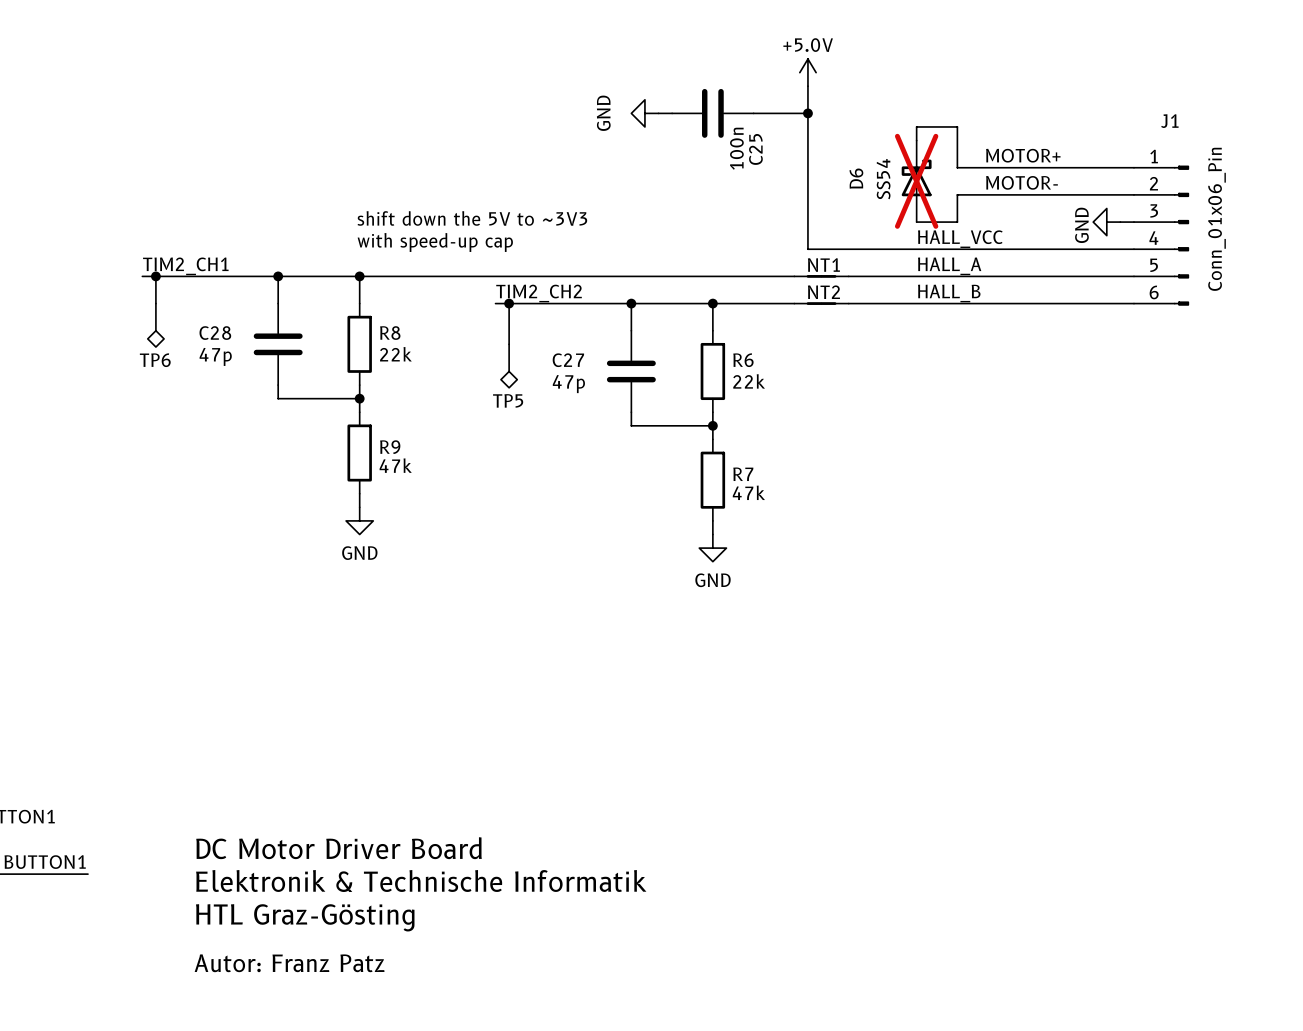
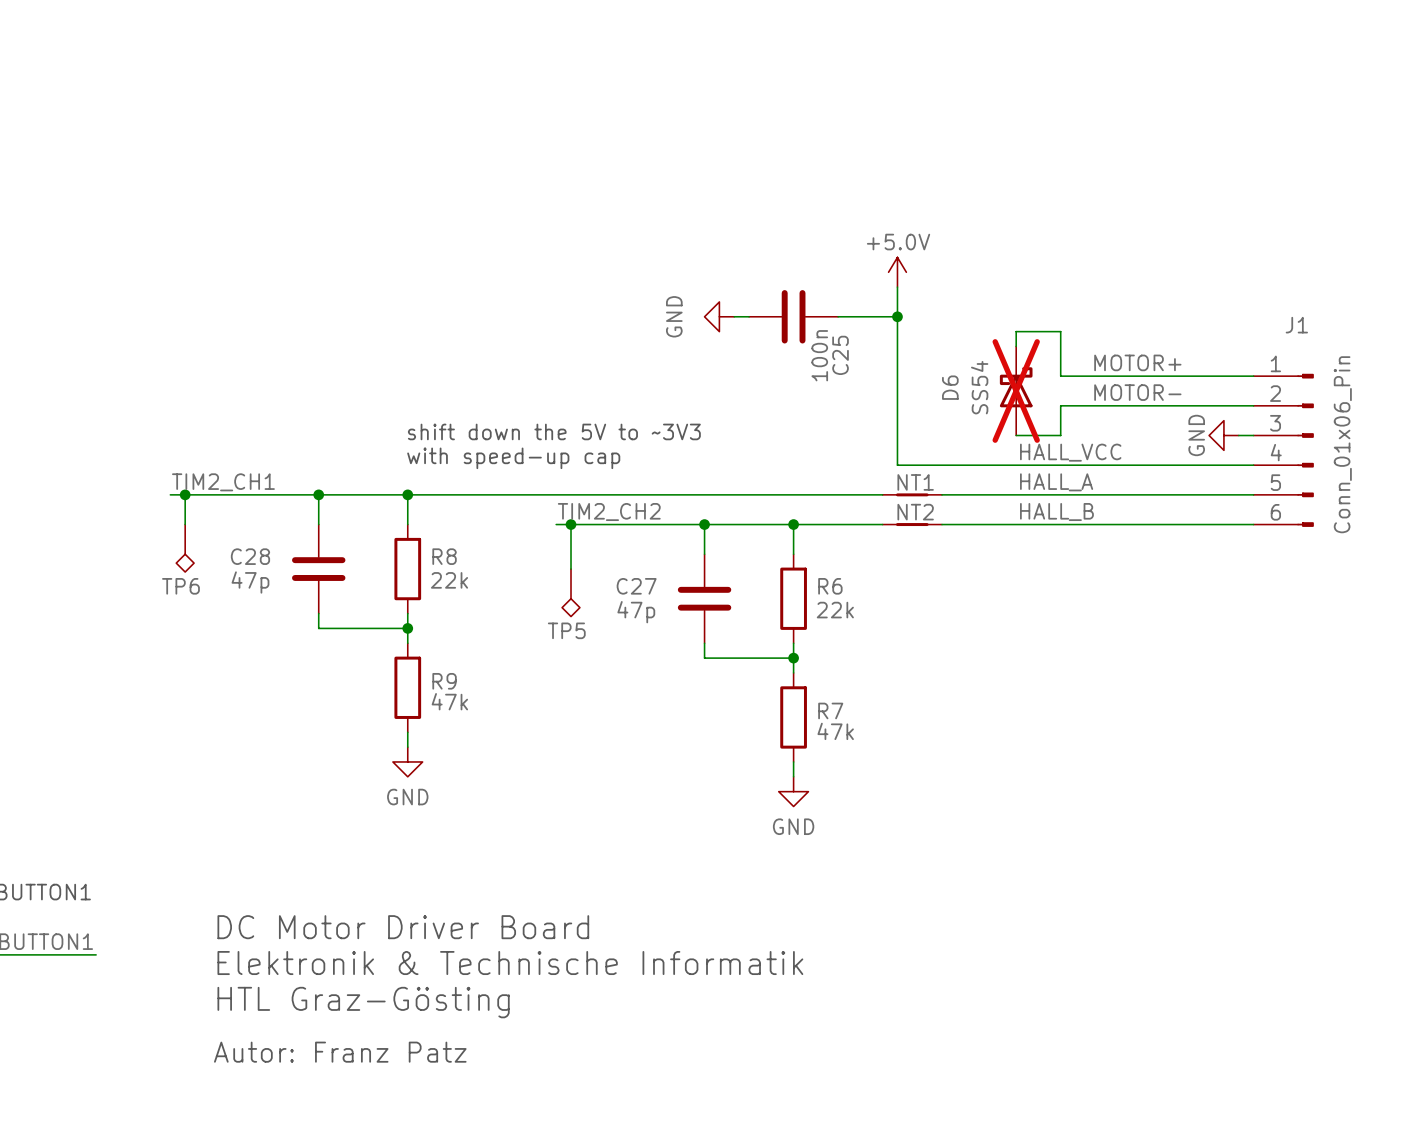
power symbol position: +5.0V (807, 72) -> +5.0V (897, 272)
wire: (807, 86) (807, 249) (1133, 249) -> (897, 287) (897, 465) (1253, 465)
power symbol: GND (644, 113) -> none
wire: (658, 113) (672, 113) -> (734, 316) (749, 316)
C25 position: (712, 113) -> (793, 316)
wire: (753, 113) (807, 113) -> (838, 316) (897, 316)
junction: (807, 113) -> none
wire: (916, 140) (916, 126) (957, 126) (957, 167) (1133, 167) -> none
label position: MOTOR+ (1023, 155) -> MOTOR+ (1137, 362)
D6 position: (916, 181) -> (1016, 390)
label position: MOTOR- (1021, 182) -> MOTOR- (1137, 392)
wire: (1133, 194) (957, 194) (957, 222) (916, 222) -> (1253, 405) (1060, 405) (1060, 435) (1016, 435)
text position: shift down the 5V to ~3V3 (472, 218) -> shift down the 5V to ~3V3 (554, 431)
power symbol position: GND (1106, 222) -> GND (1223, 435)
wire: (1120, 222) (1133, 222) -> (1238, 435) (1253, 435)
J1 position: (1161, 235) -> (1283, 450)
label position: HALL_VCC (960, 239) -> HALL_VCC (1070, 452)
text position: with speed-up cap (435, 242) -> with speed-up cap (513, 458)
label position: TIM2_CH1 (185, 266) -> TIM2_CH1 (223, 482)
label position: HALL_A (949, 266) -> HALL_A (1056, 482)
wire: (142, 276) (794, 276) -> (170, 494) (882, 494)
wire: (155, 276) (155, 303) -> (185, 494) (185, 524)
junction: (155, 276) -> none
wire: (278, 276) (278, 303) -> (318, 494) (318, 524)
junction: (278, 276) -> none
wire: (359, 276) (359, 303) -> (407, 494) (407, 524)
junction: (359, 276) -> none
NT1 position: (821, 276) -> (912, 494)
wire: (848, 276) (1133, 276) -> (941, 494) (1253, 494)
power symbol: none -> GND (719, 316)
junction: none -> (897, 316)
label position: TIM2_CH2 (539, 293) -> TIM2_CH2 (609, 512)
label position: HALL_B (949, 293) -> HALL_B (1056, 512)
wire: (495, 303) (794, 303) -> (556, 524) (882, 524)
wire: (509, 303) (509, 344) -> (571, 524) (571, 569)
junction: (509, 303) -> none
wire: (631, 303) (631, 330) -> (704, 524) (704, 554)
junction: (631, 303) -> none
wire: (712, 303) (712, 330) -> (793, 524) (793, 554)
junction: (712, 303) -> none
NT2 position: (821, 303) -> (912, 524)
wire: (848, 303) (930, 303) -> (1016, 346) (1016, 331)
wire: (970, 303) (1133, 303) -> (1060, 331) (1060, 376) (1253, 376)
TP6 position: (155, 325) -> (185, 548)
C28 position: (278, 344) -> (318, 569)
R8 position: (359, 344) -> (407, 569)
TP5 position: (509, 366) -> (571, 592)
C27 position: (631, 371) -> (704, 598)
R6 position: (712, 371) -> (793, 598)
wire: (278, 385) (278, 398) (359, 398) -> (318, 613) (318, 628) (407, 628)
wire: (359, 385) (359, 412) -> (407, 613) (407, 643)
junction: (359, 398) -> none
wire: (631, 412) (631, 425) (712, 425) -> (704, 643) (704, 658) (793, 658)
wire: (712, 412) (712, 439) -> (793, 643) (793, 672)
junction: (712, 425) -> none
junction: none -> (185, 494)
junction: none -> (318, 494)
R9 position: (359, 453) -> (407, 687)
junction: none -> (407, 494)
junction: none -> (571, 524)
junction: none -> (704, 524)
R7 position: (712, 480) -> (793, 717)
junction: none -> (793, 524)
wire: none -> (941, 524) (1253, 524)
wire: (359, 493) (359, 507) -> (407, 732) (407, 747)
power symbol position: GND (359, 520) -> GND (407, 761)
wire: (712, 520) (712, 534) -> (793, 761) (793, 776)
power symbol: GND (712, 548) -> none
junction: none -> (407, 628)
junction: none -> (793, 658)
power symbol: none -> GND (793, 791)

